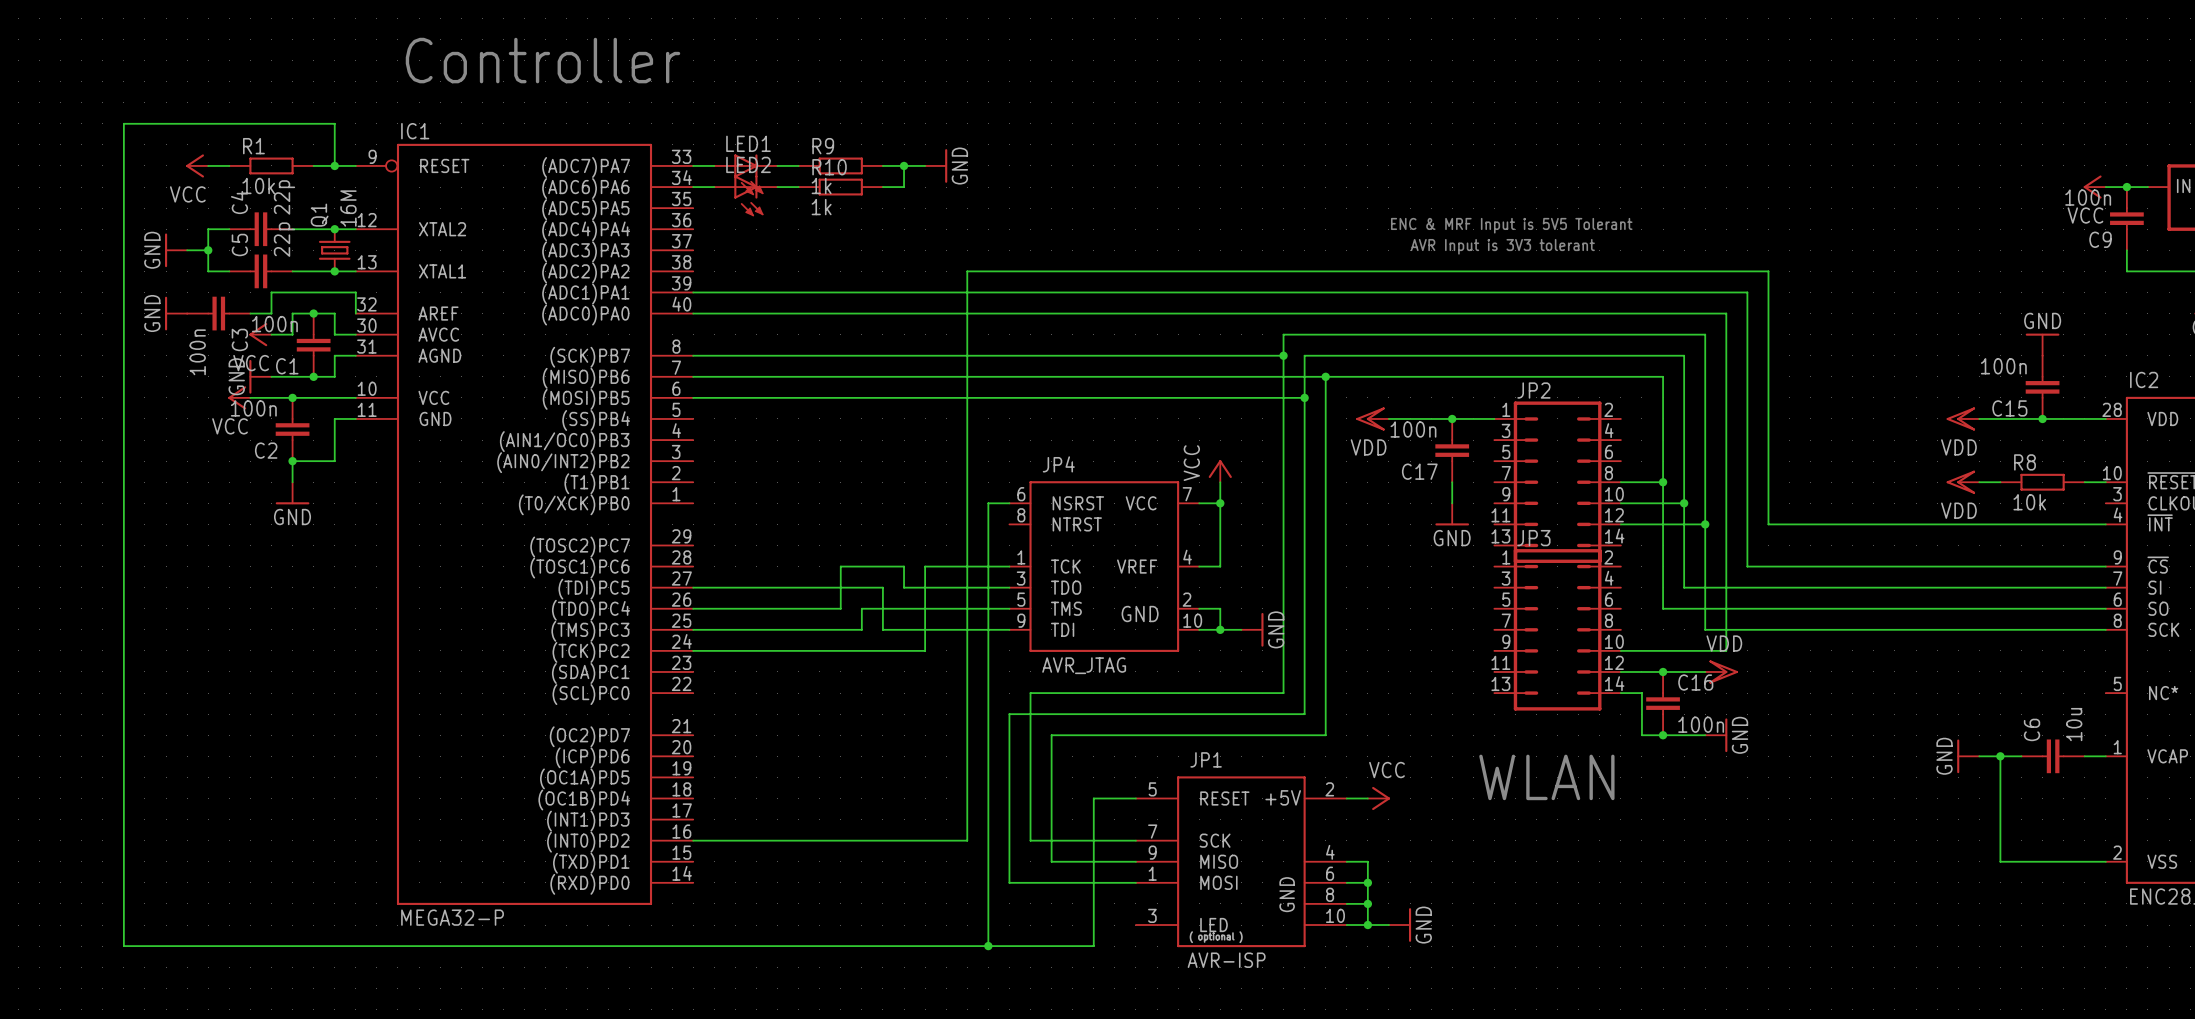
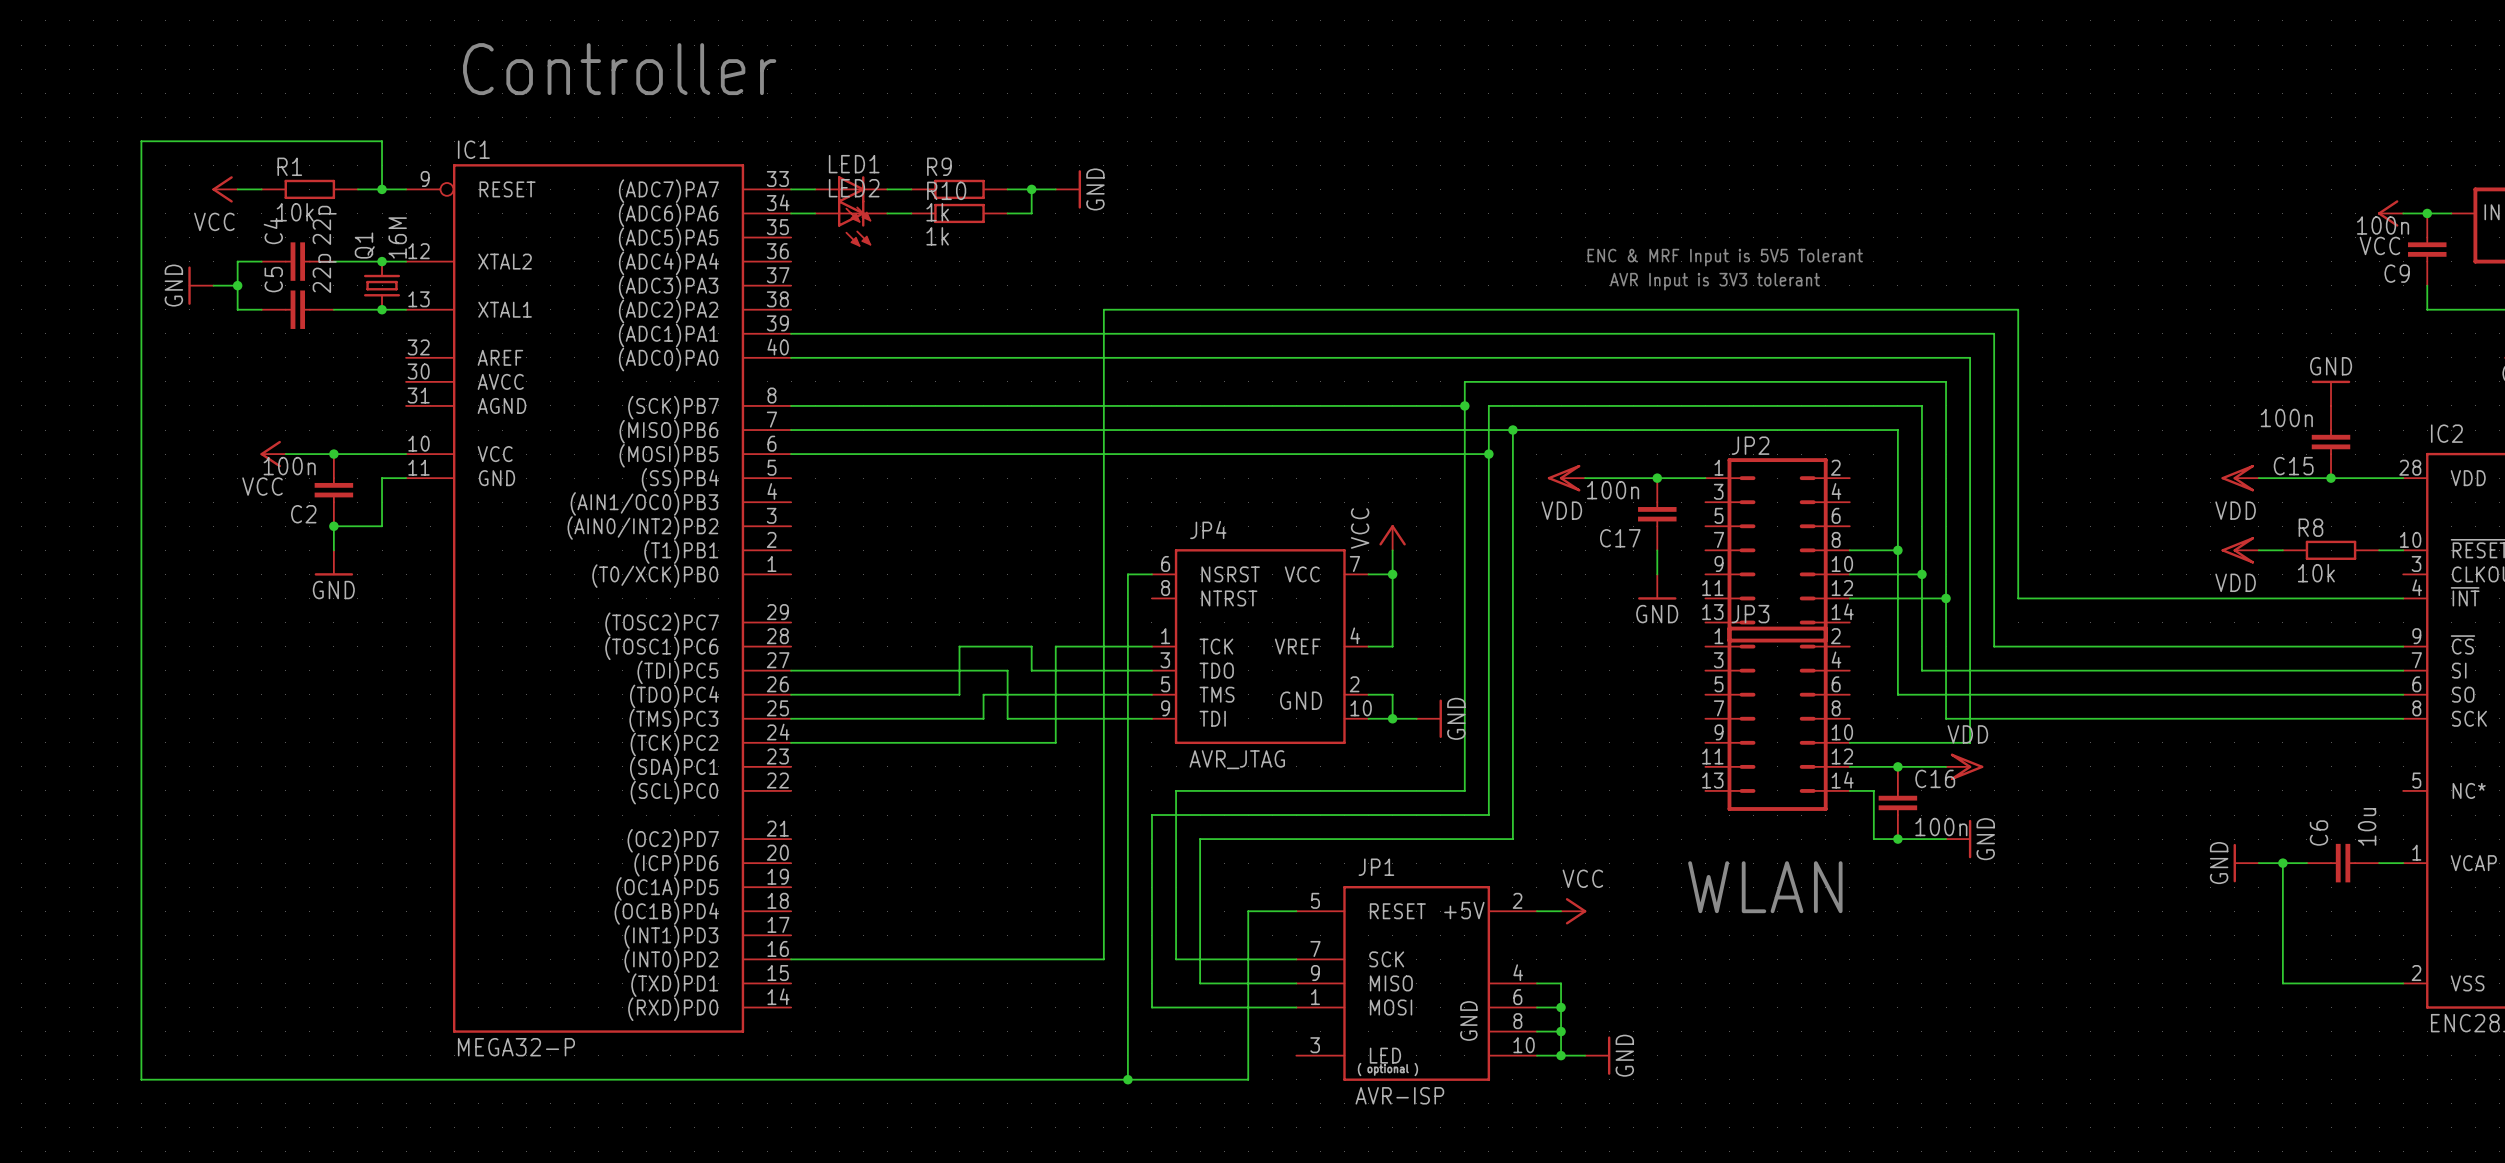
power symbol: GND (176, 313) -> none
C3: 100n (218, 313) -> none
wire: (250, 313) (271, 313) (271, 292) (355, 292) (355, 313) -> none
junction: (313, 313) -> none
power symbol: VCC (260, 334) -> none
wire: (271, 334) (292, 334) (292, 313) (334, 313) (334, 334) (355, 334) -> none
C1: 100n (313, 345) -> none
wire: (355, 355) (334, 355) (334, 376) (271, 376) -> none
power symbol: GND (260, 376) -> none
junction: (313, 376) -> none

